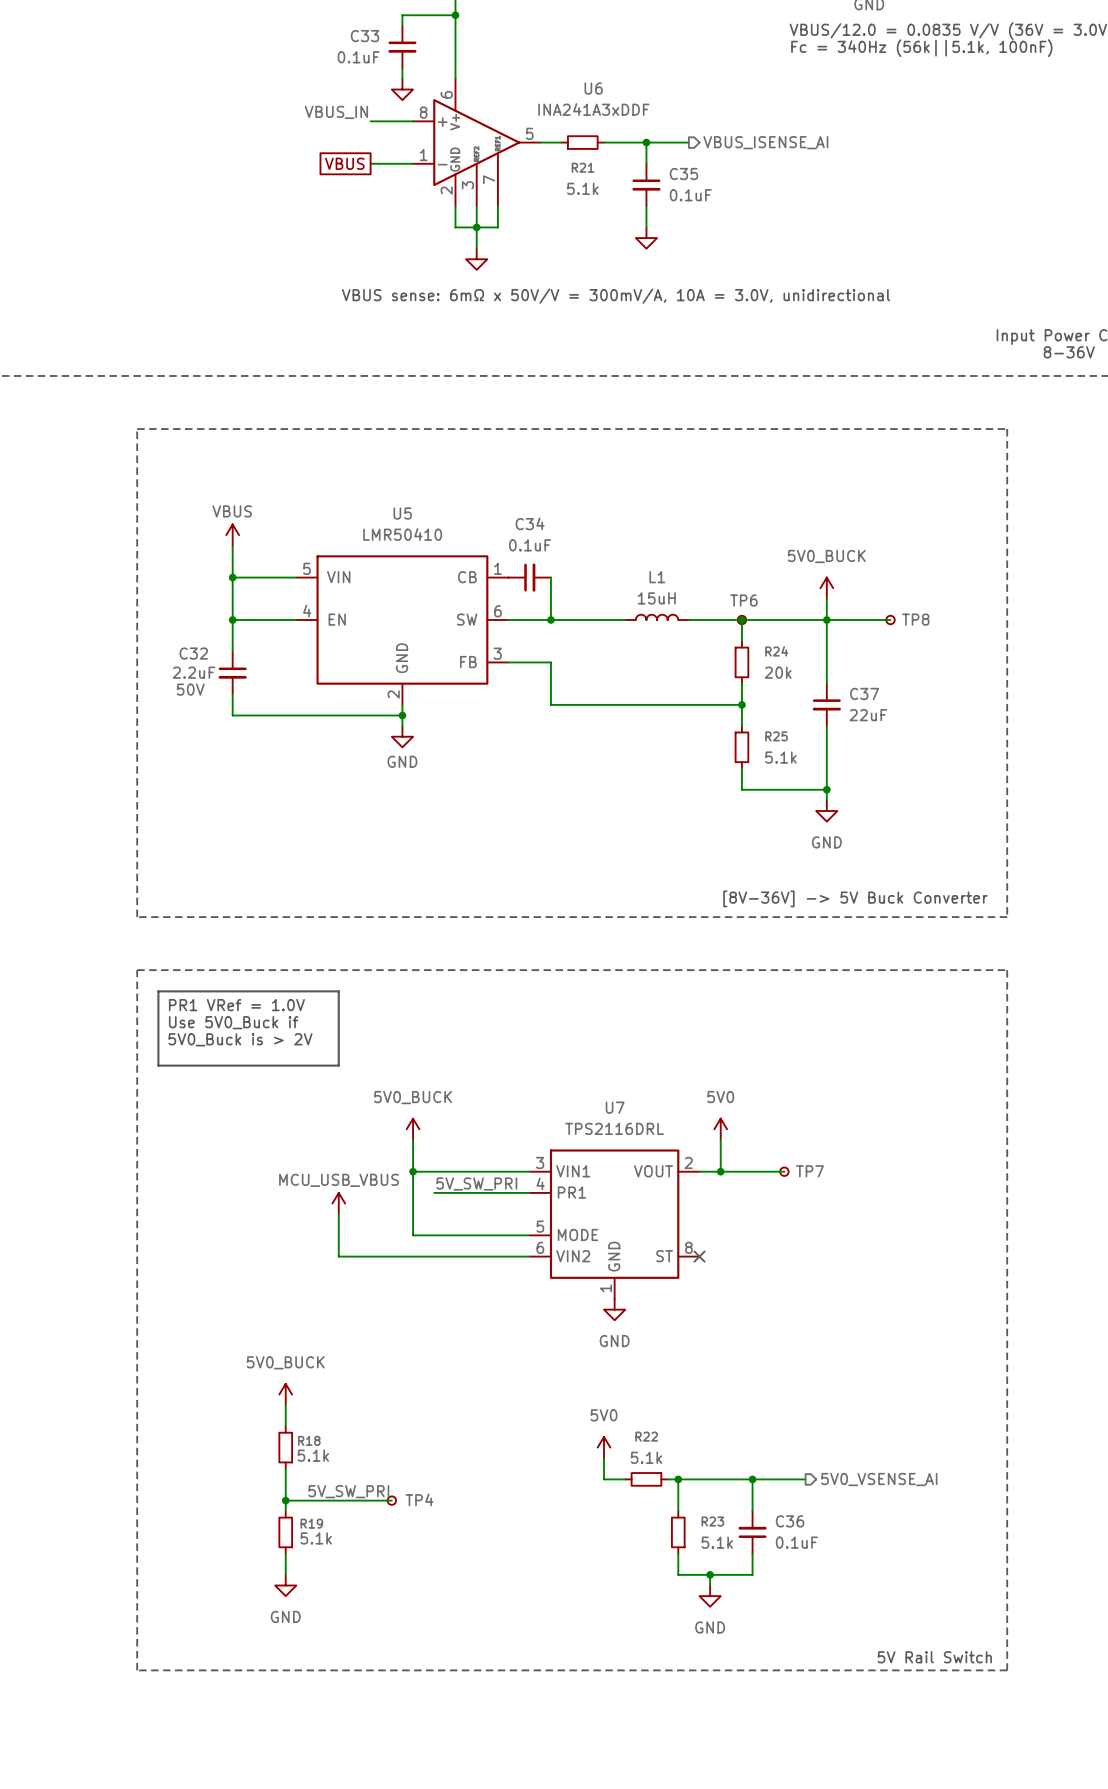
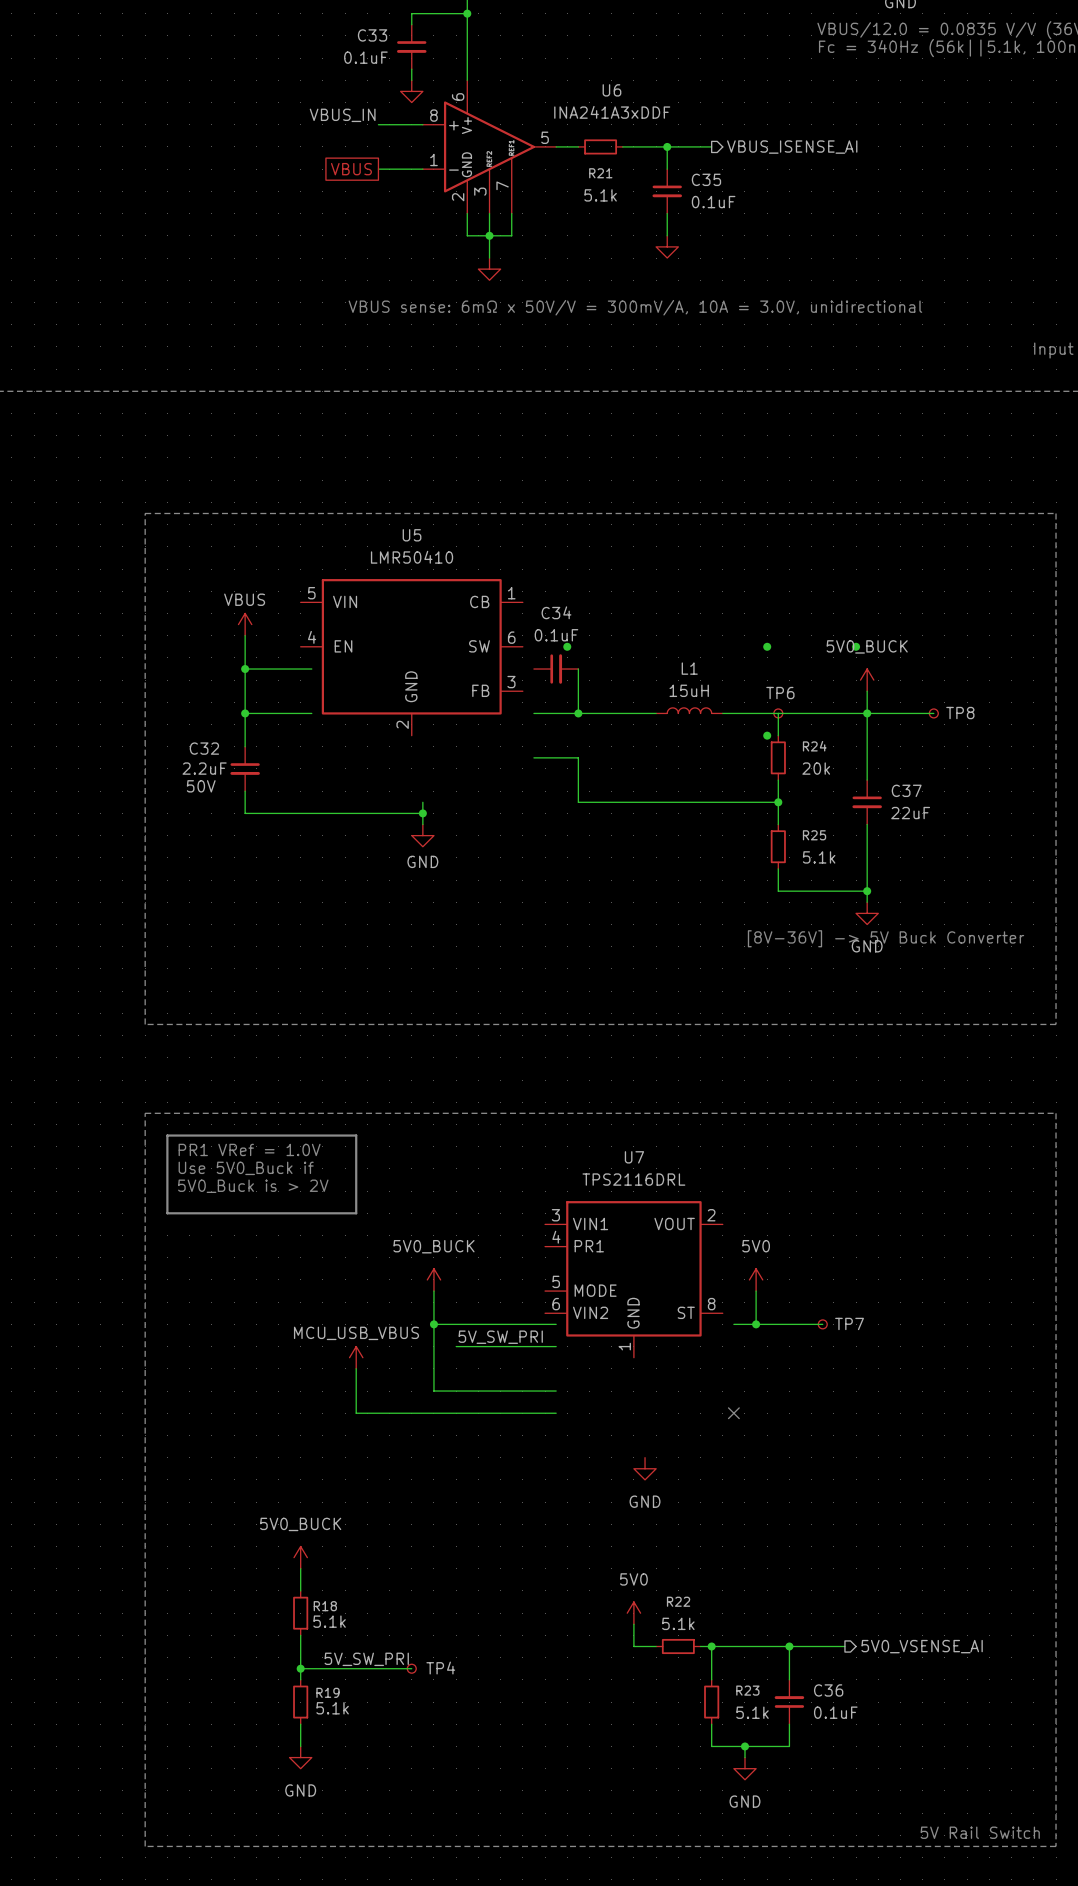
line: (137, 429) (1007, 429) (1007, 917) (137, 917) (137, 429) -> (145, 513) (1056, 513) (1056, 1024) (145, 1024) (145, 513)
power symbol position: VBUS (232, 535) -> VBUS (245, 624)
wire: (232, 545) (232, 651) -> (245, 635) (245, 746)
wire: (232, 577) (296, 577) -> (245, 669) (311, 669)
junction: (232, 577) -> none
C34 position: (529, 577) -> (556, 669)
wire: (550, 577) (550, 620) -> (578, 669) (578, 713)
power symbol position: 5V0_BUCK (826, 588) -> 5V0_BUCK (867, 680)
wire: (826, 598) (826, 683) -> (867, 691) (867, 780)
L1 position: (657, 617) -> (689, 710)
wire: (232, 620) (296, 620) -> (245, 713) (311, 713)
junction position: (232, 620) -> (245, 669)
wire: (508, 620) (625, 620) -> (533, 713) (656, 713)
wire: (688, 620) (890, 620) -> (722, 713) (933, 713)
wire: (741, 620) (741, 641) -> (778, 713) (778, 735)
TP6 position: (741, 620) -> (778, 713)
TP8 position: (890, 620) -> (933, 713)
wire: (508, 662) (550, 662) (550, 704) (741, 704) -> (533, 757) (578, 757) (578, 802) (778, 802)
R24 position: (741, 662) -> (778, 757)
C32 position: (232, 673) -> (245, 768)
junction: none -> (245, 713)
junction: none -> (578, 713)
wire: (741, 683) (741, 726) -> (778, 780) (778, 824)
junction: none -> (867, 713)
wire: (232, 694) (232, 715) (402, 715) -> (245, 791) (245, 813) (422, 813)
wire: (402, 704) (402, 726) -> (422, 802) (422, 824)
C37 position: (826, 704) -> (867, 802)
junction: (402, 715) -> none
wire: (826, 726) (826, 800) -> (867, 824) (867, 902)
power symbol position: GND (402, 736) -> GND (422, 835)
R25 position: (741, 747) -> (778, 846)
wire: (741, 768) (741, 789) (826, 789) -> (778, 868) (778, 891) (867, 891)
junction: none -> (778, 802)
junction: none -> (422, 813)
junction: (826, 789) -> none
power symbol position: GND (826, 810) -> GND (867, 913)
junction: none -> (867, 891)
line: (137, 970) (137, 1670) (1007, 1670) (1007, 970) (137, 970) -> (145, 1113) (145, 1846) (1056, 1846) (1056, 1113) (145, 1113)
line: (158, 991) (338, 991) (338, 1065) (158, 1065) (158, 991) -> (167, 1135) (356, 1135) (356, 1213) (167, 1213) (167, 1135)
text position: PR1 VRef = 1.0V (236, 1005) -> PR1 VRef = 1.0V (249, 1149)
text position: Use 5V0_Buck if (233, 1022) -> Use 5V0_Buck if (246, 1168)
text position: 5V0_Buck is > 2V (240, 1039) -> 5V0_Buck is > 2V (253, 1186)
power symbol position: 5V0_BUCK (413, 1129) -> 5V0_BUCK (433, 1279)
power symbol position: 5V0 (720, 1129) -> 5V0 (756, 1279)
wire: (413, 1139) (413, 1235) (529, 1235) -> (433, 1291) (433, 1391) (556, 1391)
wire: (720, 1139) (720, 1171) -> (756, 1291) (756, 1324)
wire: (413, 1171) (529, 1171) -> (433, 1324) (556, 1324)
junction: (413, 1171) -> none
wire: (699, 1171) (784, 1171) -> (733, 1324) (822, 1324)
junction: (720, 1171) -> none
TP7 position: (784, 1171) -> (822, 1324)
label position: 5V_SW_PRI (476, 1183) -> 5V_SW_PRI (500, 1337)
wire: (434, 1192) (529, 1192) -> (456, 1346) (556, 1346)
power symbol position: MCU_USB_VBUS (338, 1203) -> MCU_USB_VBUS (356, 1357)
wire: (338, 1214) (338, 1256) (529, 1256) -> (356, 1368) (356, 1413) (556, 1413)
no-connect mark: (699, 1256) -> none
junction: none -> (433, 1324)
junction: none -> (756, 1324)
power symbol position: GND (614, 1309) -> GND (645, 1468)
no-connect mark: none -> (733, 1413)
power symbol position: 5V0_BUCK (285, 1394) -> 5V0_BUCK (300, 1557)
wire: (285, 1405) (285, 1426) -> (300, 1568) (300, 1590)
R18 position: (285, 1447) -> (300, 1613)
power symbol position: 5V0 (604, 1447) -> 5V0 (633, 1613)
wire: (604, 1458) (604, 1479) (625, 1479) -> (633, 1624) (633, 1646) (656, 1646)
wire: (285, 1468) (285, 1511) -> (300, 1635) (300, 1679)
R22 position: (646, 1479) -> (678, 1646)
wire: (667, 1479) (805, 1479) -> none
wire: (678, 1479) (678, 1511) -> (711, 1646) (711, 1679)
junction: (678, 1479) -> none
wire: (752, 1479) (752, 1511) -> (789, 1646) (789, 1679)
junction: (752, 1479) -> none
hierarchical label position: 5V0_VSENSE_AI (879, 1479) -> 5V0_VSENSE_AI (922, 1646)
label position: 5V_SW_PRI (348, 1491) -> 5V_SW_PRI (366, 1659)
wire: (285, 1500) (391, 1500) -> (300, 1668) (411, 1668)
junction: (285, 1500) -> none
TP4 position: (391, 1500) -> (411, 1668)
R19 position: (285, 1532) -> (300, 1702)
R23 position: (678, 1532) -> (711, 1702)
C36 position: (752, 1532) -> (789, 1702)
wire: (285, 1553) (285, 1574) -> (300, 1724) (300, 1746)
wire: (678, 1553) (678, 1574) -> none
wire: (752, 1553) (752, 1574) -> (844, 1646) (778, 1646)
wire: (710, 1574) (710, 1585) -> (744, 1746) (744, 1757)
junction position: (710, 1574) -> (711, 1646)
junction: none -> (789, 1646)
power symbol position: GND (285, 1585) -> GND (300, 1757)
junction: none -> (300, 1668)
power symbol position: GND (710, 1596) -> GND (744, 1768)
wire: none -> (711, 1724) (711, 1746) (789, 1746) (789, 1724)
text position: 5V Rail Switch (934, 1657) -> 5V Rail Switch (980, 1832)
junction: none -> (744, 1746)

